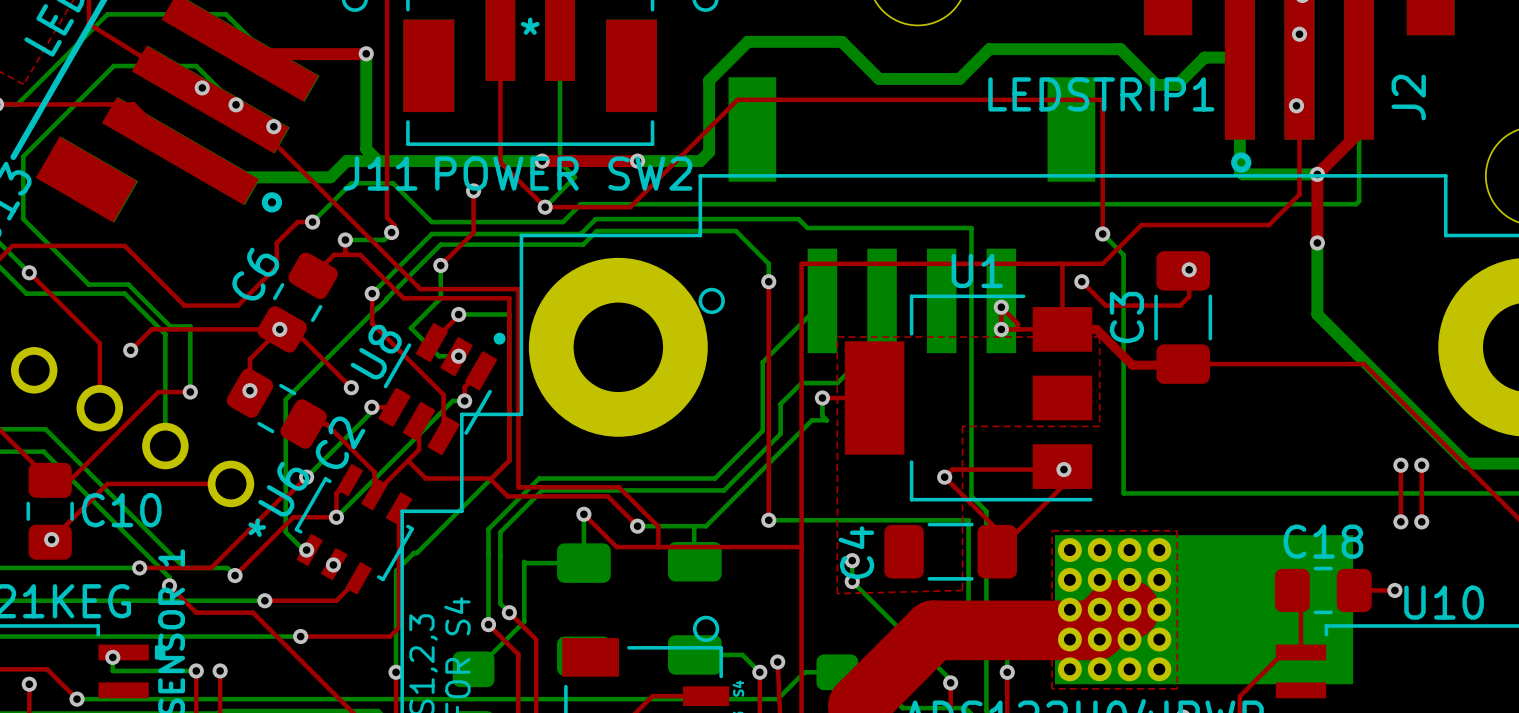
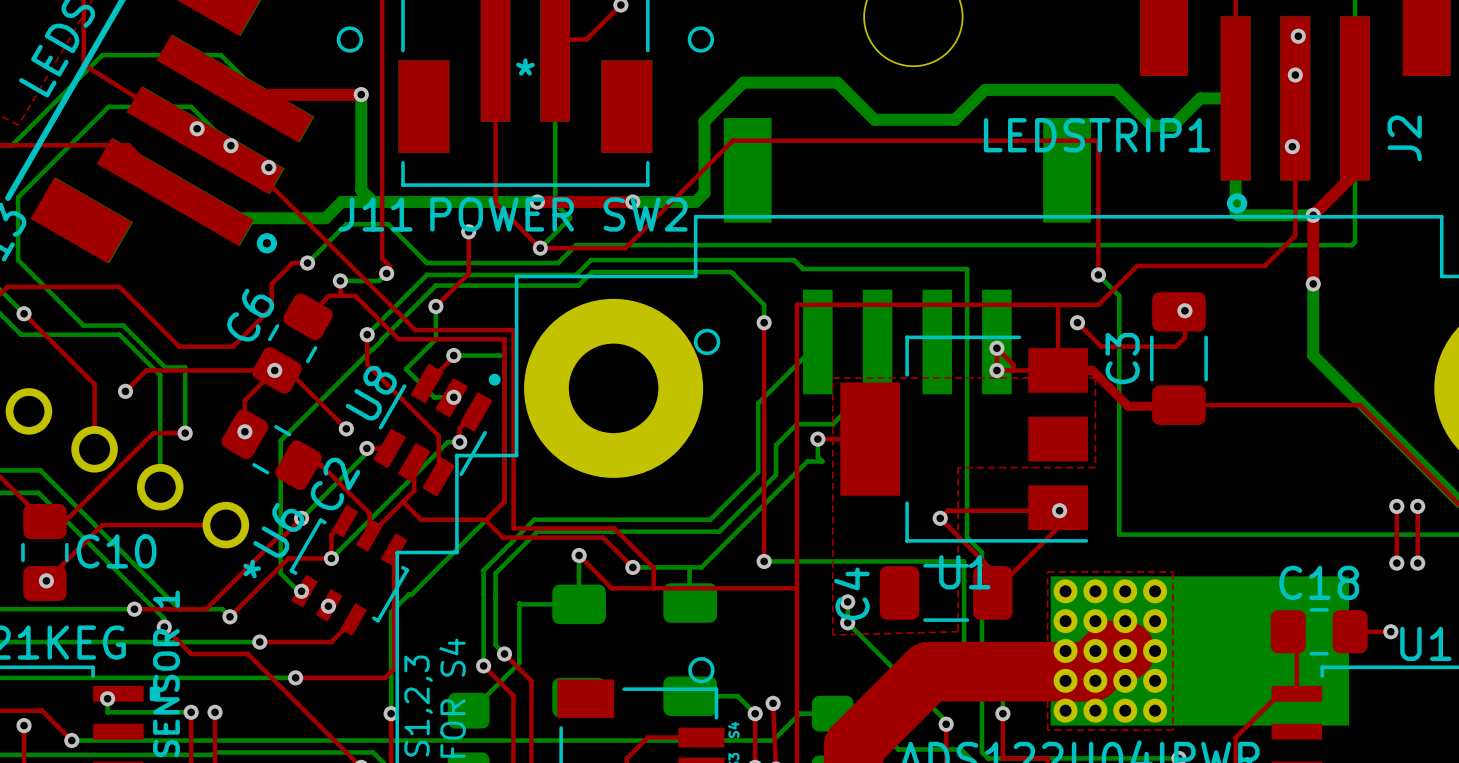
U1 name position: U1 (977, 271) -> U1 (964, 572)

